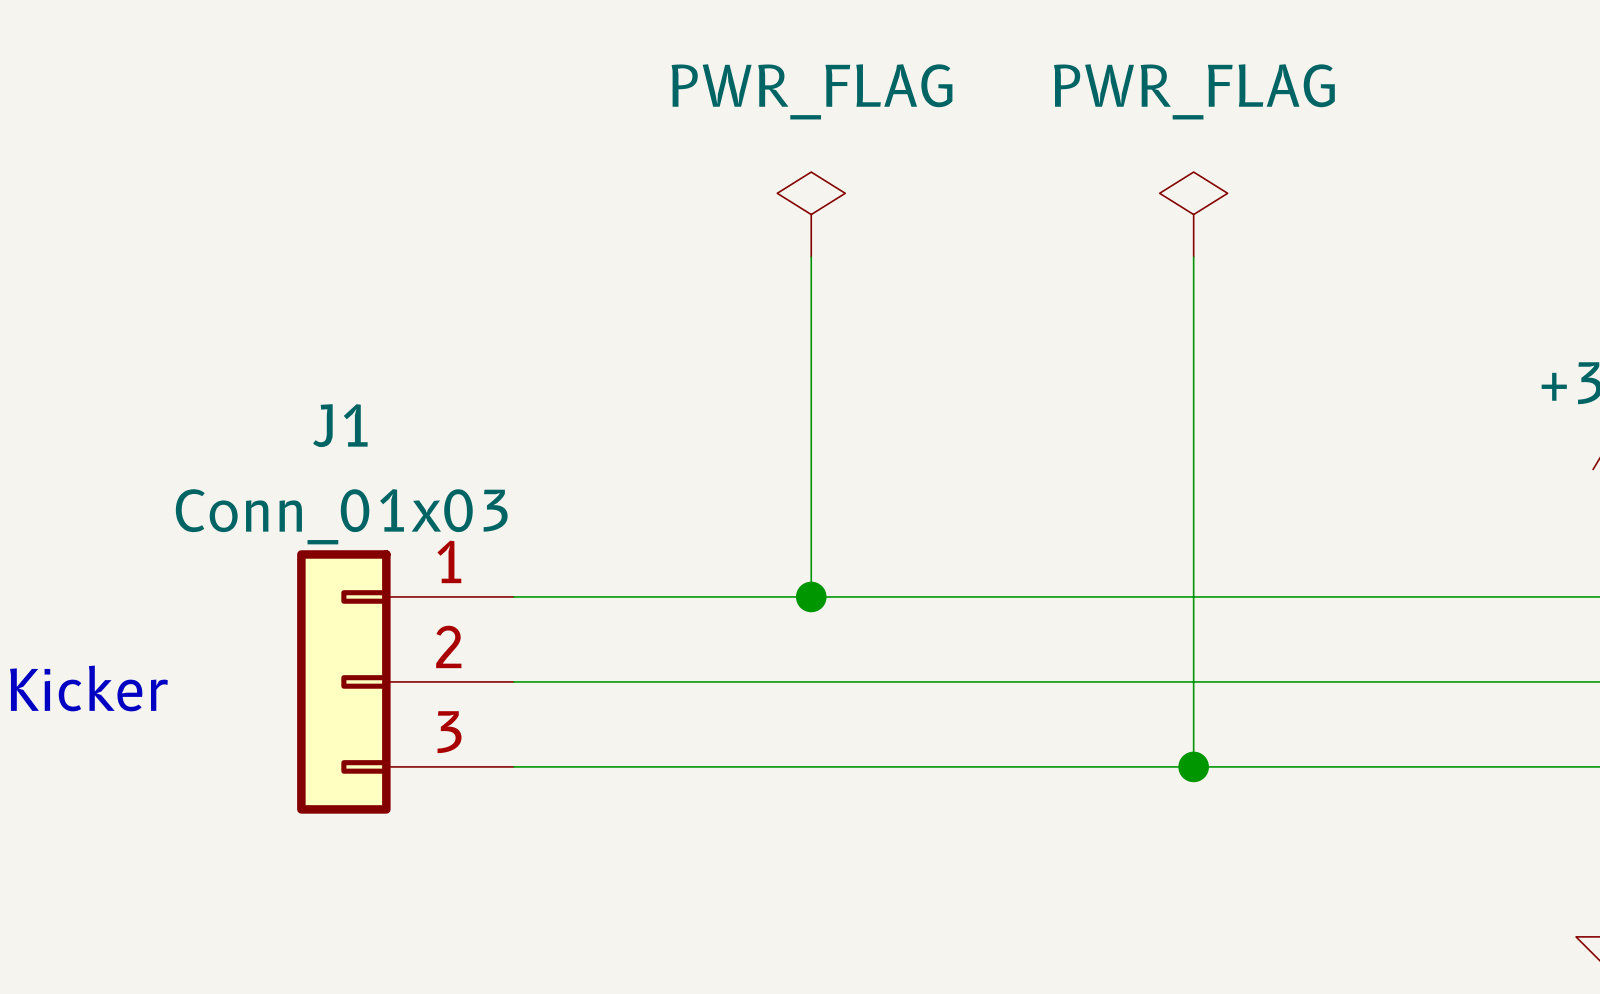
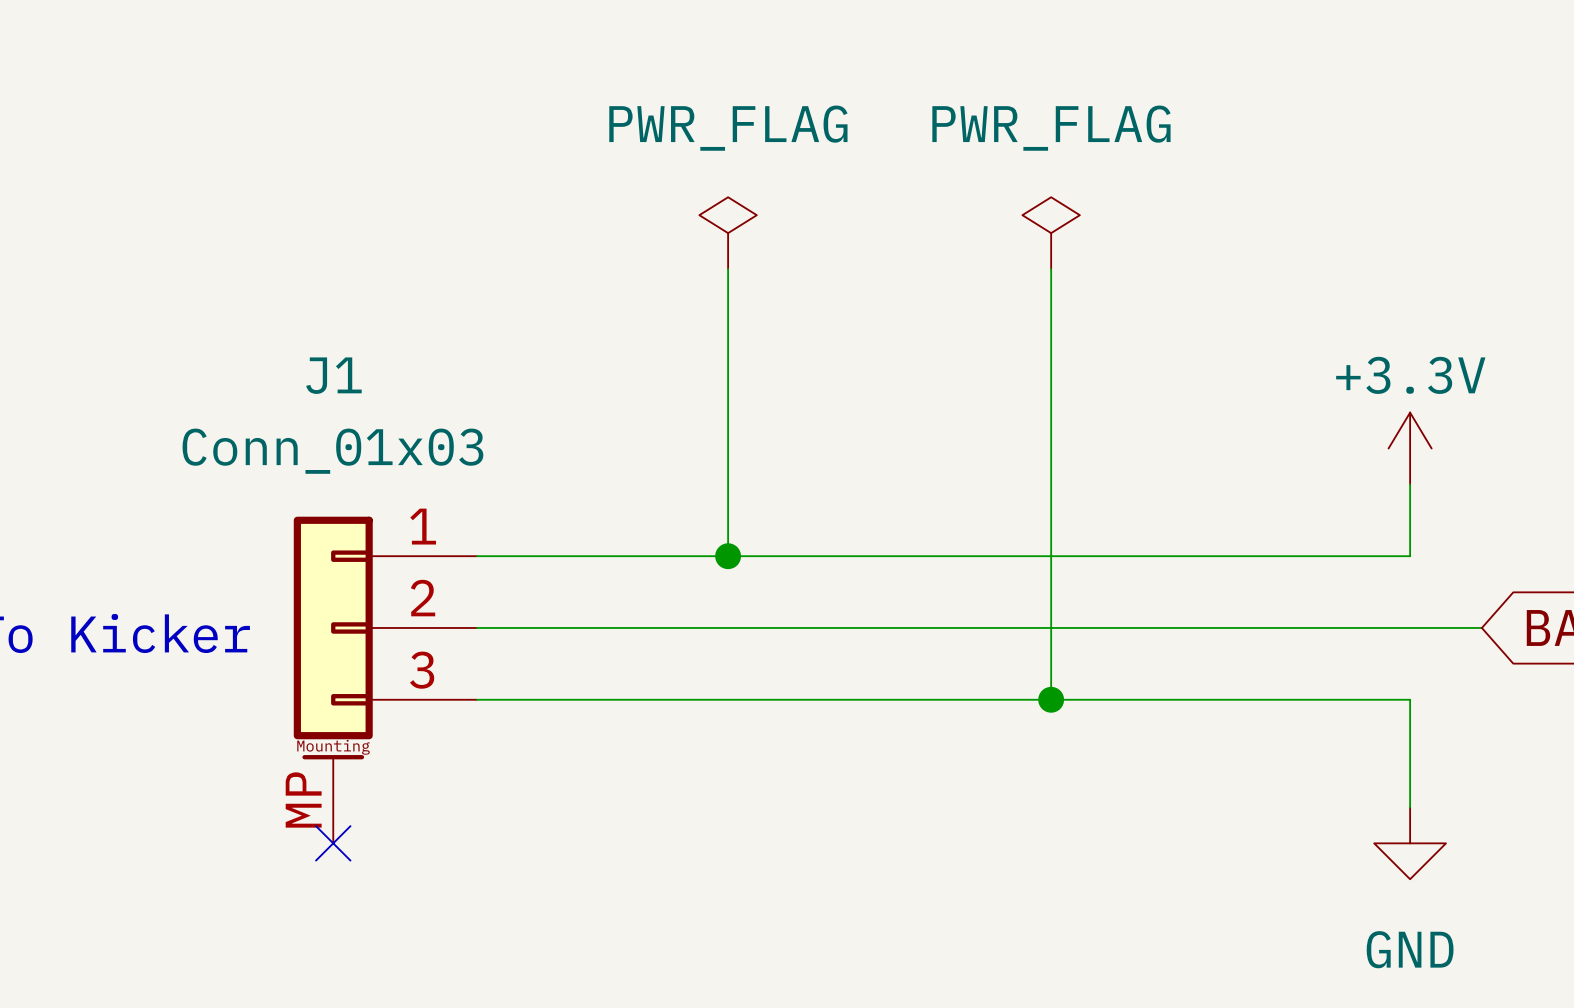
J1 name position: J1 (340, 425) -> J1 (333, 375)
J1 value position: Conn_01x03 (341, 516) -> Conn_01x03 (332, 451)
J1 symbol: [297, 550, 514, 814] -> [293, 516, 477, 844]
no-connect mark: none -> (333, 843)

